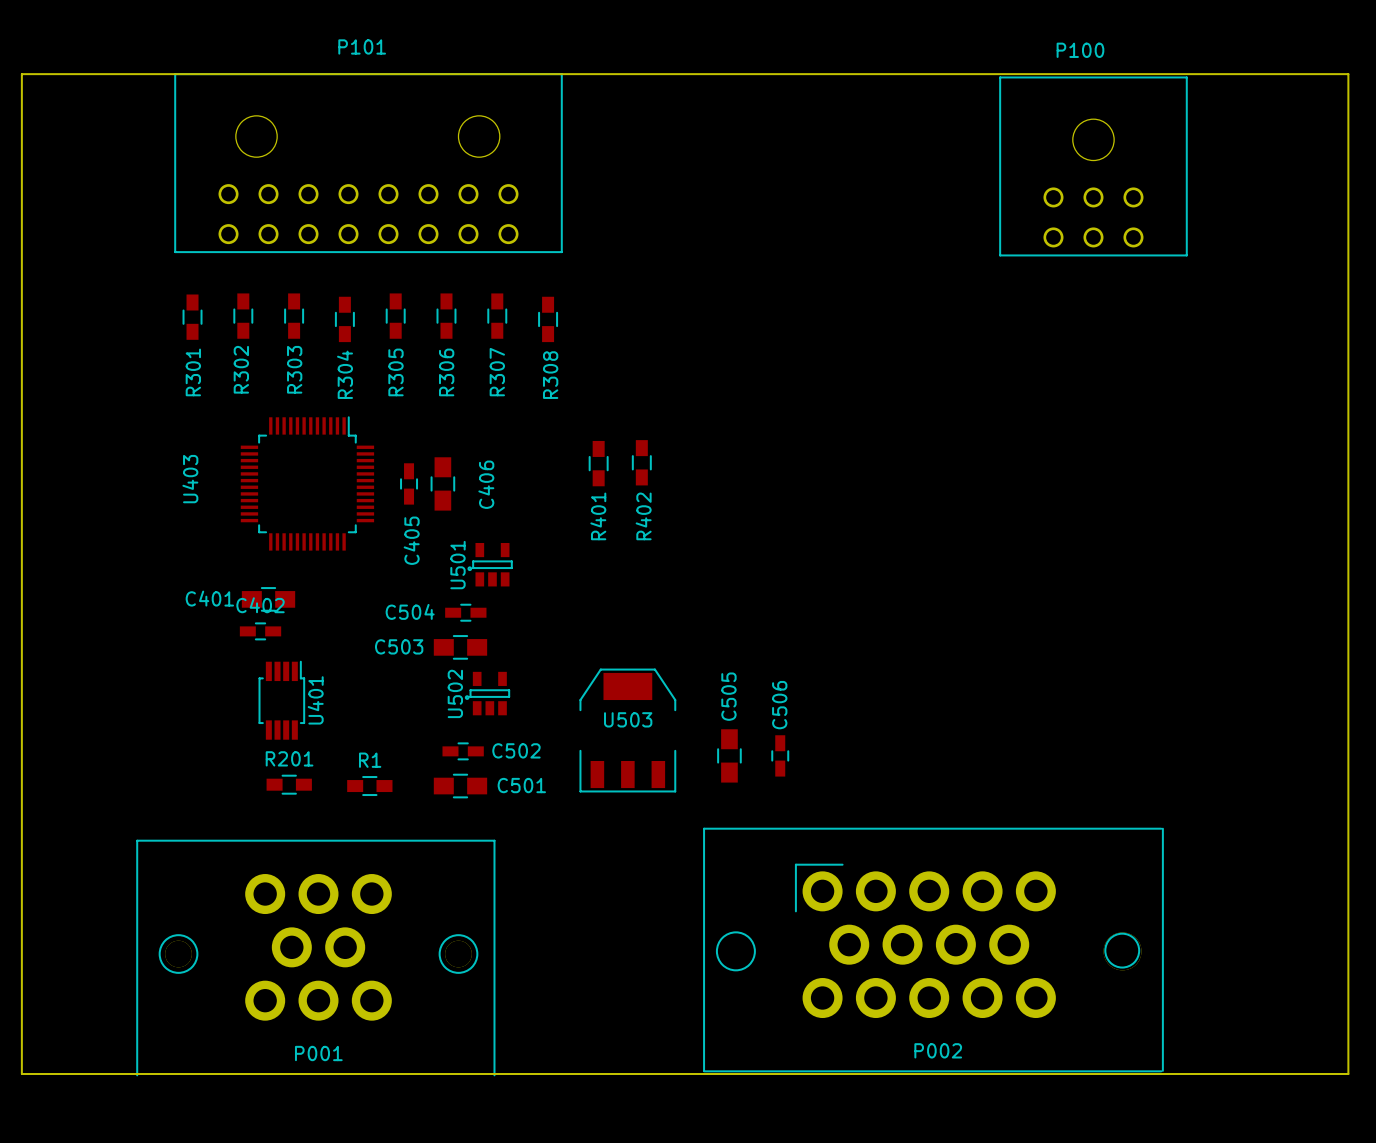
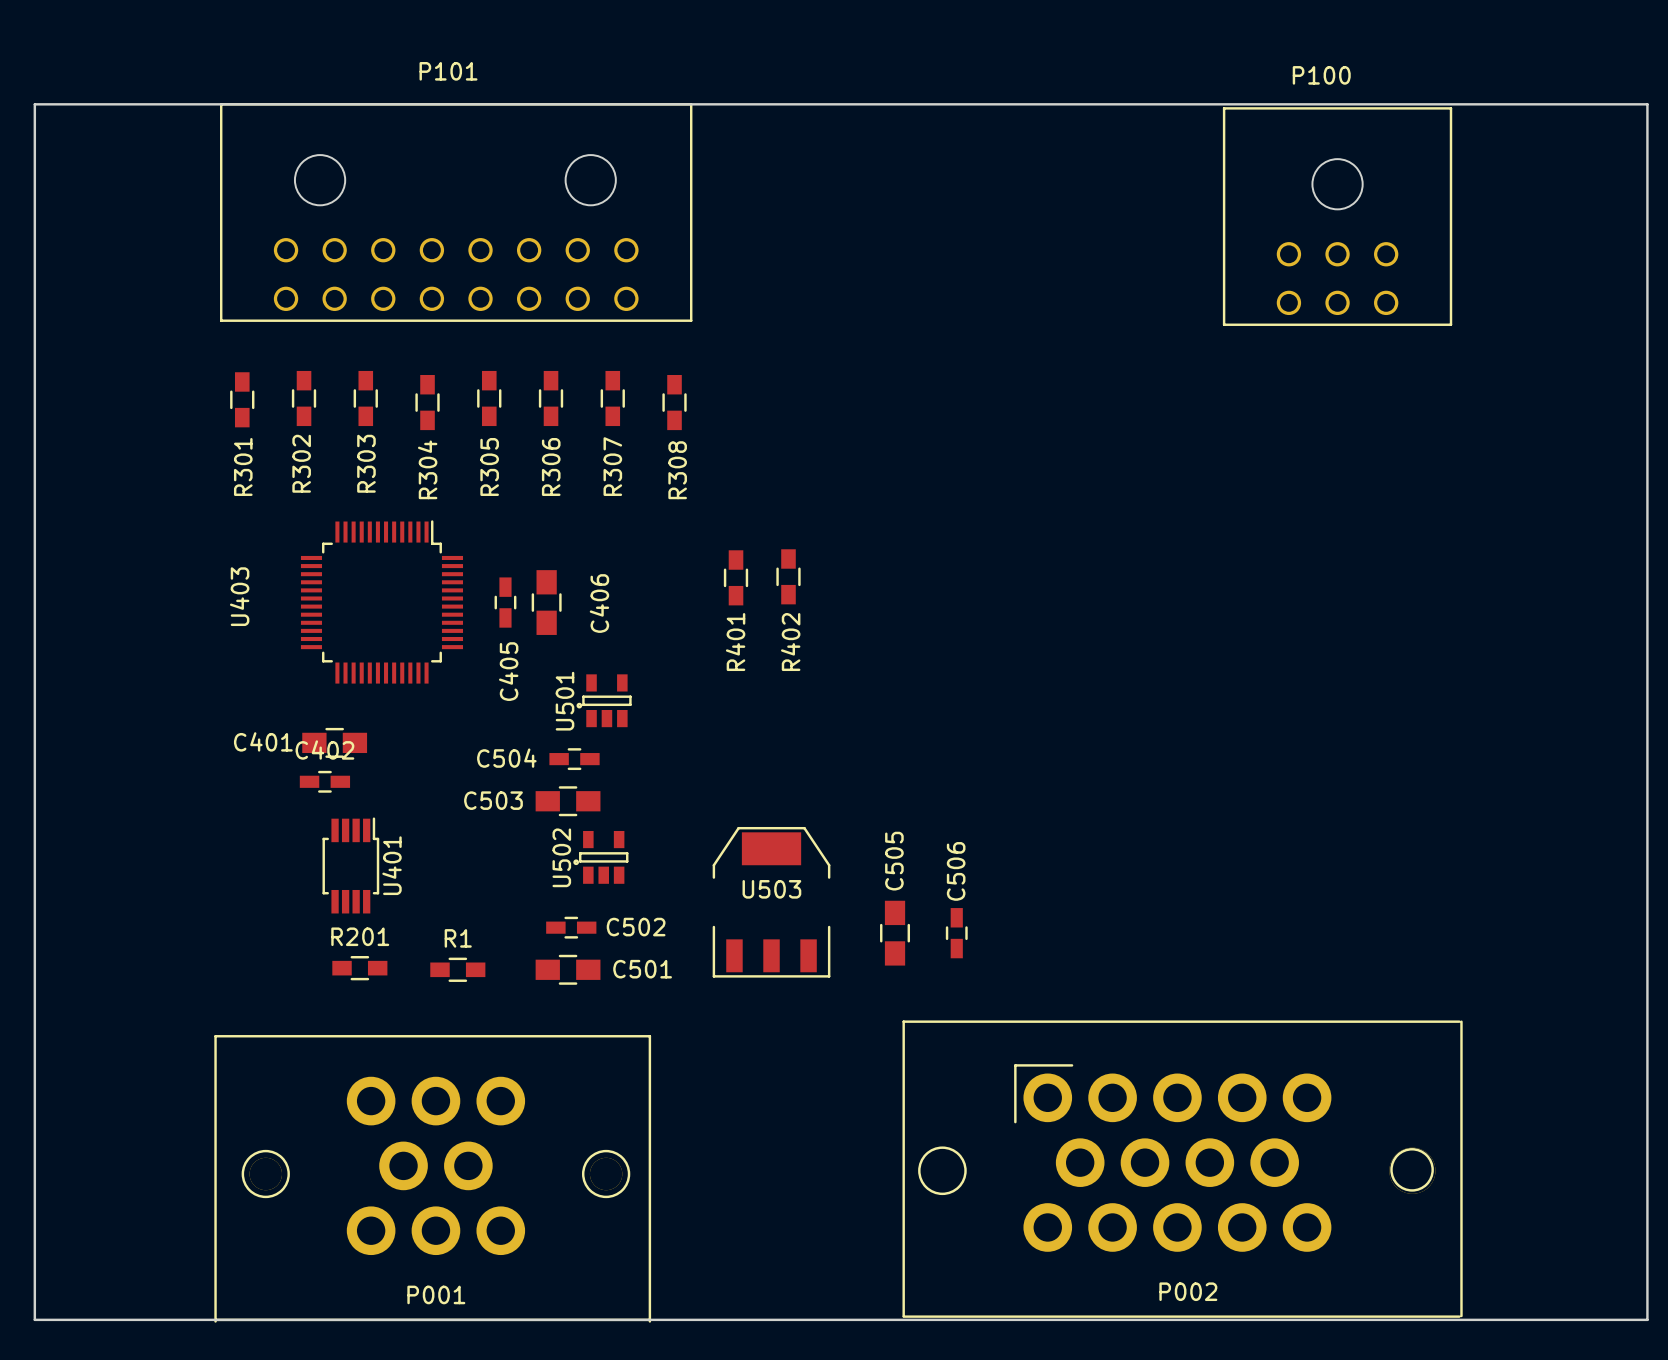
P002 position: (933, 950) -> (1182, 1169)
P001 position: (315, 958) -> (432, 1178)

